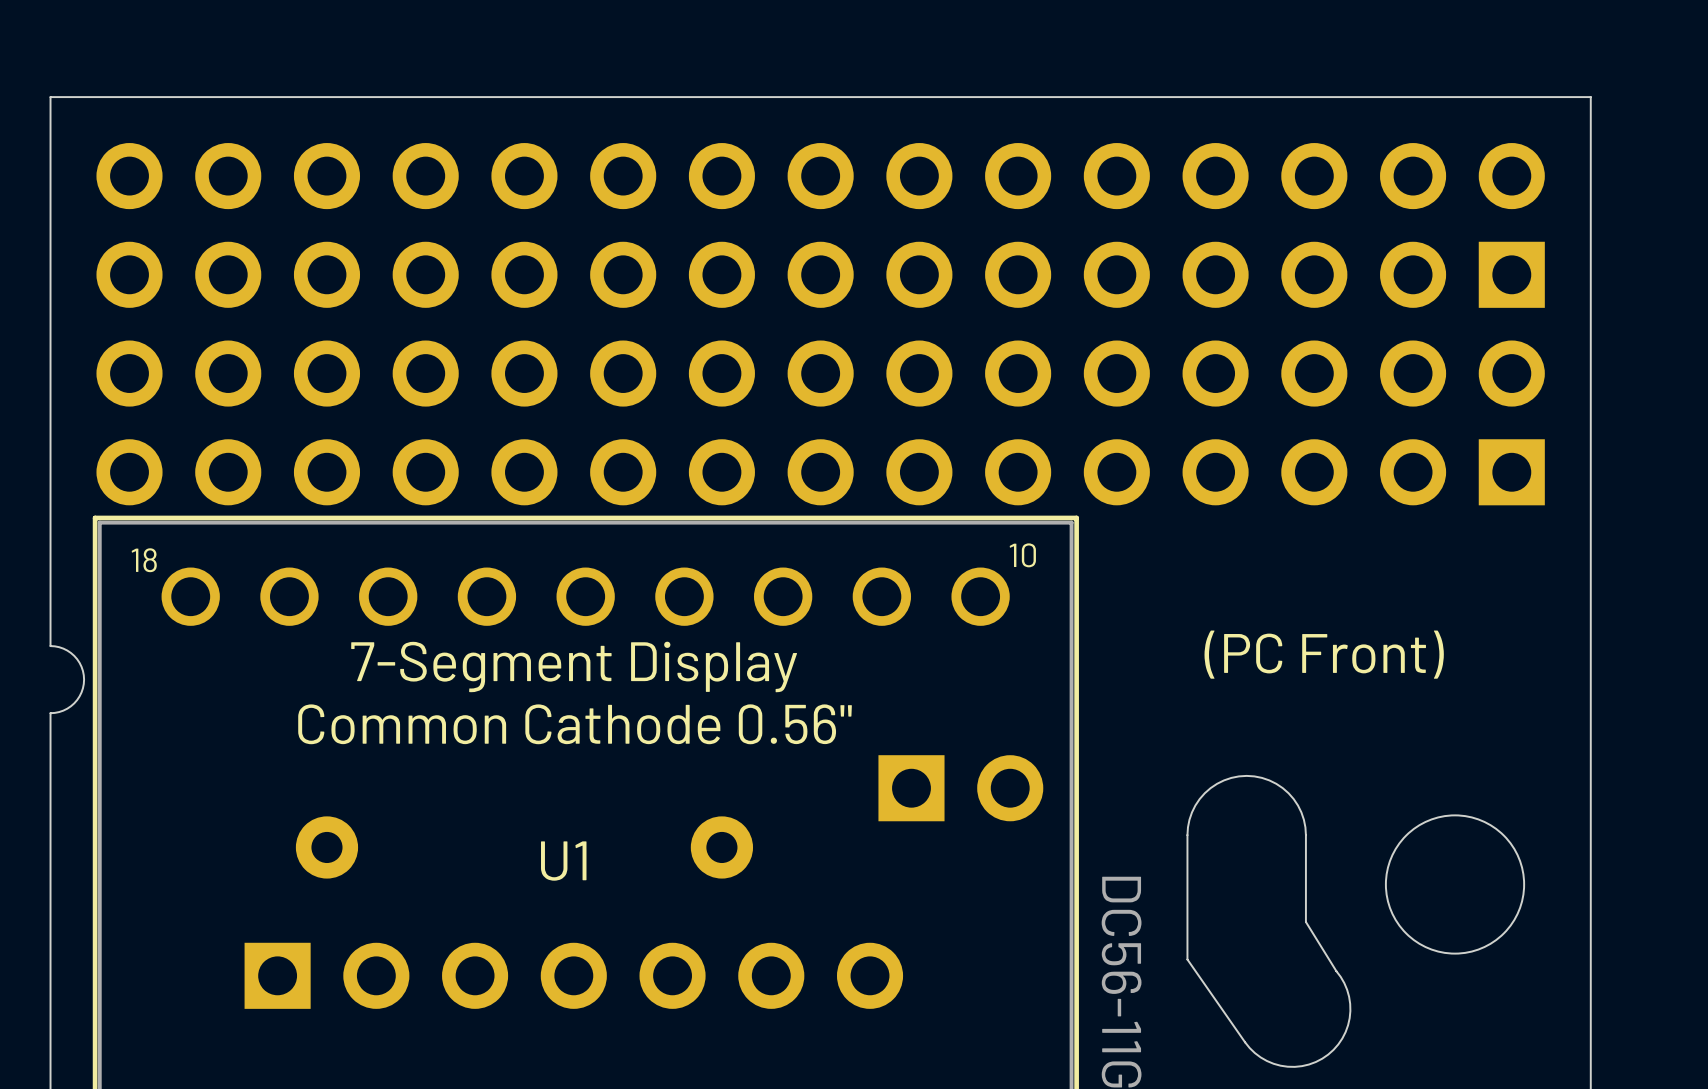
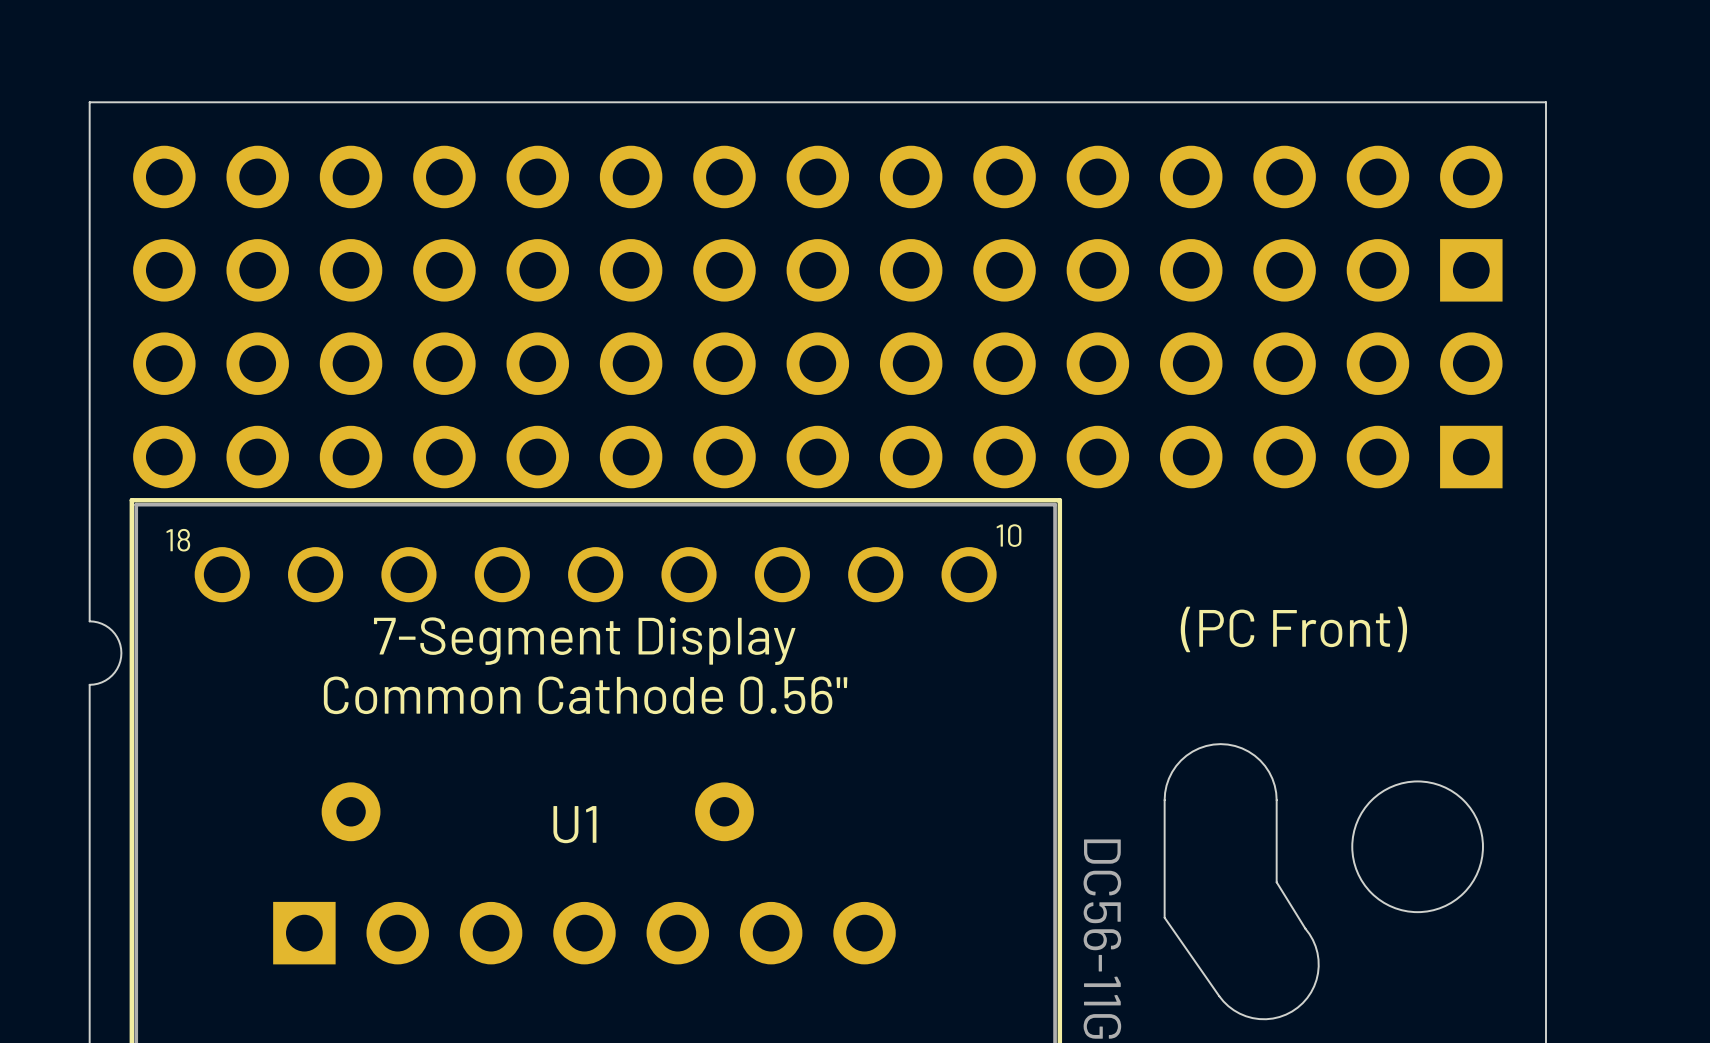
part: (960, 788) -> none

